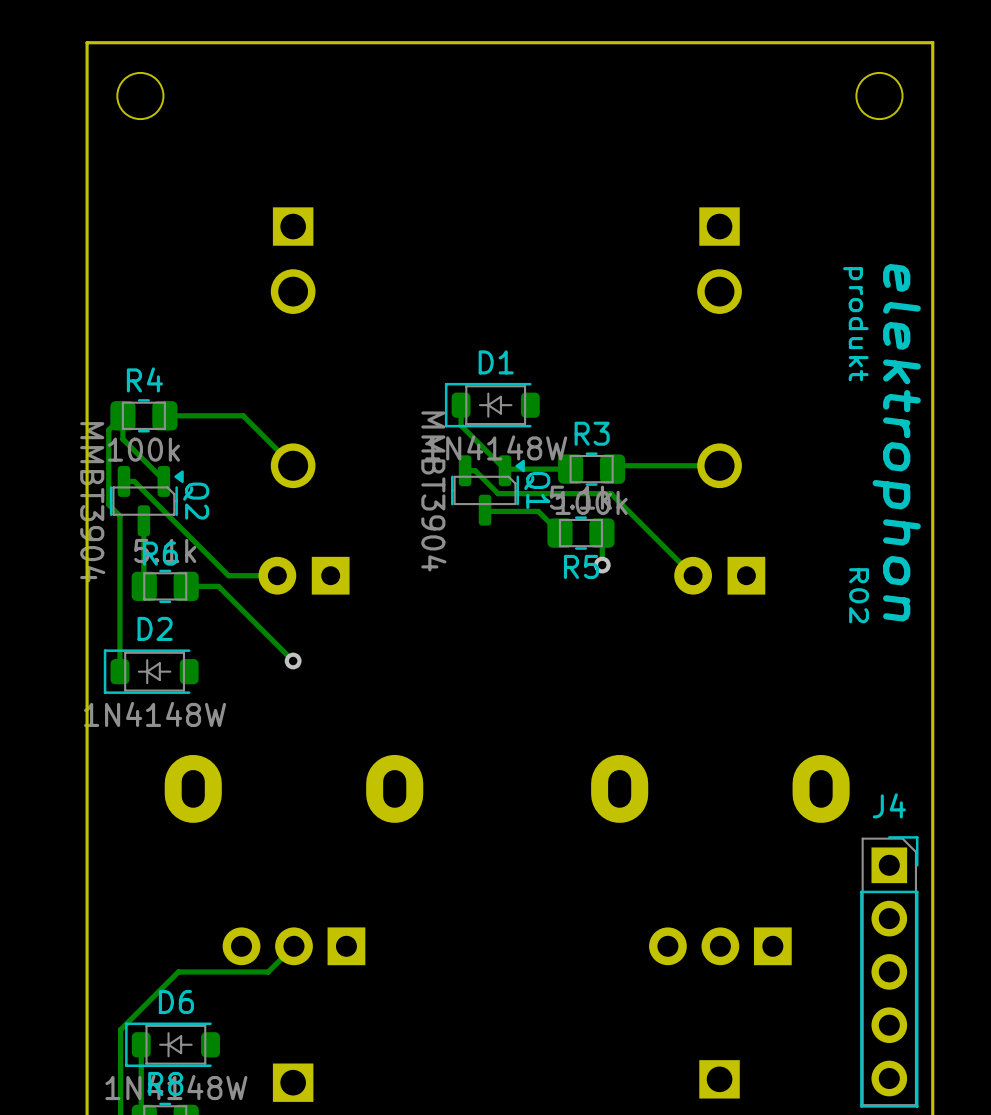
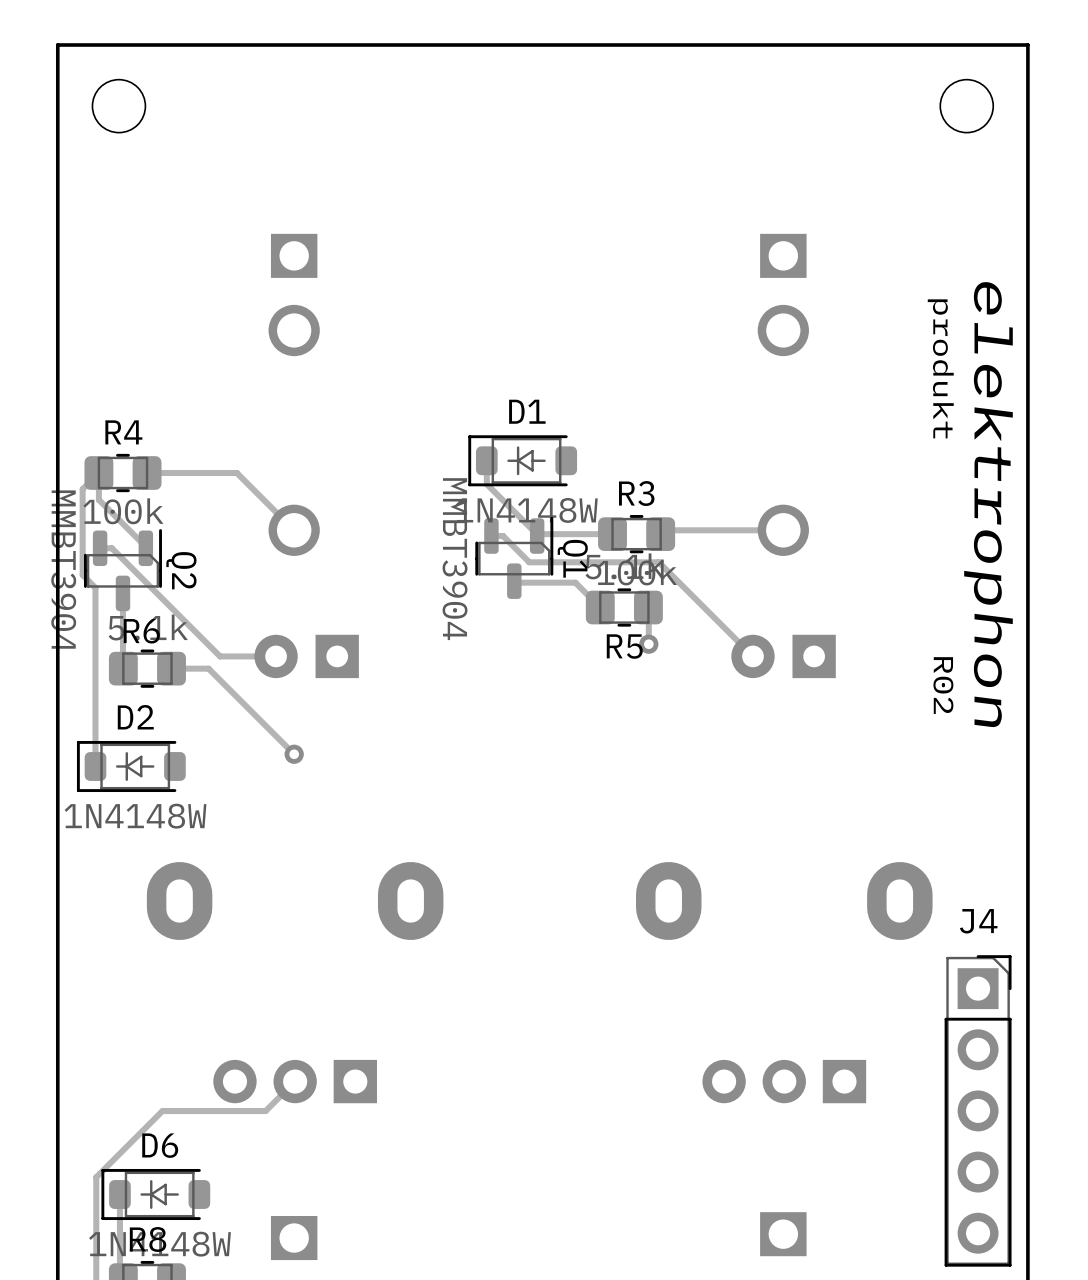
Q1 footprint: [451, 455, 525, 526] -> [475, 516, 554, 599]
Q2 footprint: [109, 465, 184, 537] -> [83, 529, 162, 612]

